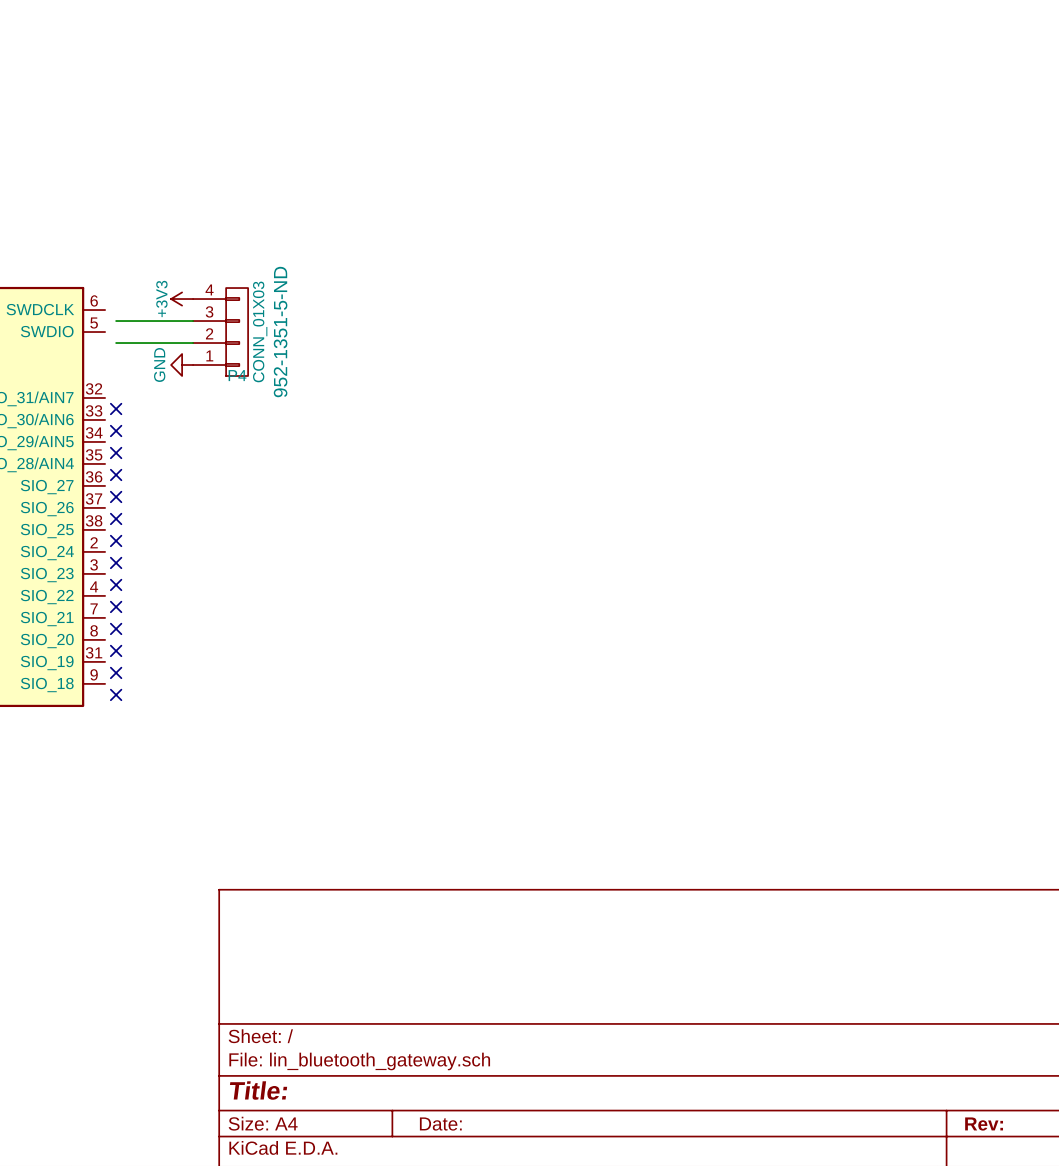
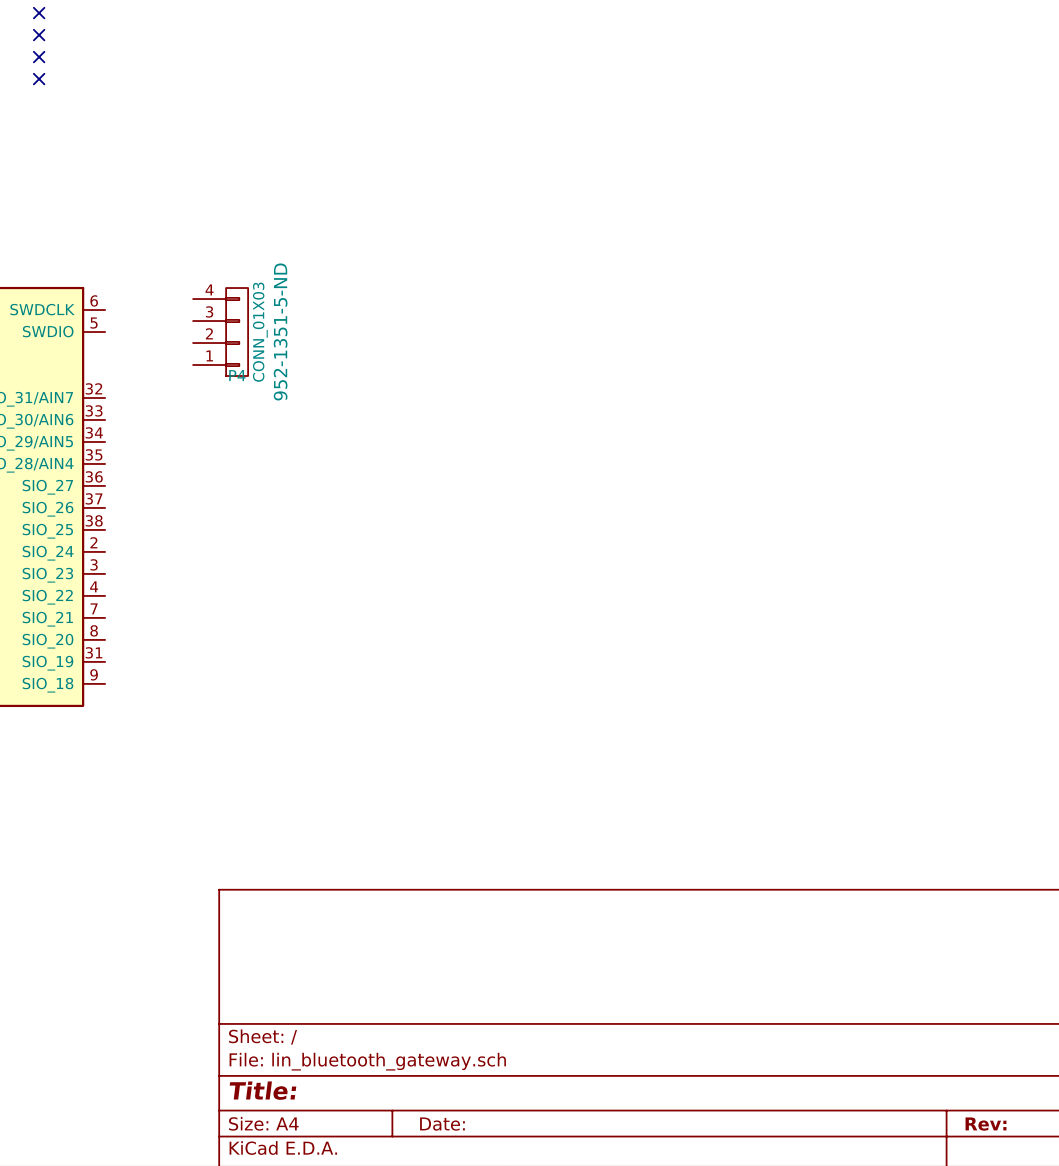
no-connect mark: none -> (39, 13)
no-connect mark: none -> (39, 35)
no-connect mark: none -> (39, 57)
no-connect mark: none -> (39, 79)
power symbol: +3V3 (182, 299) -> none
wire: (116, 321) (193, 321) -> none
wire: (116, 343) (193, 343) -> none
power symbol: GND (182, 365) -> none
no-connect mark: (116, 408) -> none
no-connect mark: (116, 430) -> none
no-connect mark: (116, 452) -> none
no-connect mark: (116, 474) -> none
no-connect mark: (116, 496) -> none
no-connect mark: (116, 518) -> none
no-connect mark: (116, 540) -> none
no-connect mark: (116, 562) -> none
no-connect mark: (116, 584) -> none
no-connect mark: (116, 606) -> none
no-connect mark: (116, 628) -> none
no-connect mark: (116, 650) -> none
no-connect mark: (116, 672) -> none
no-connect mark: (116, 694) -> none

